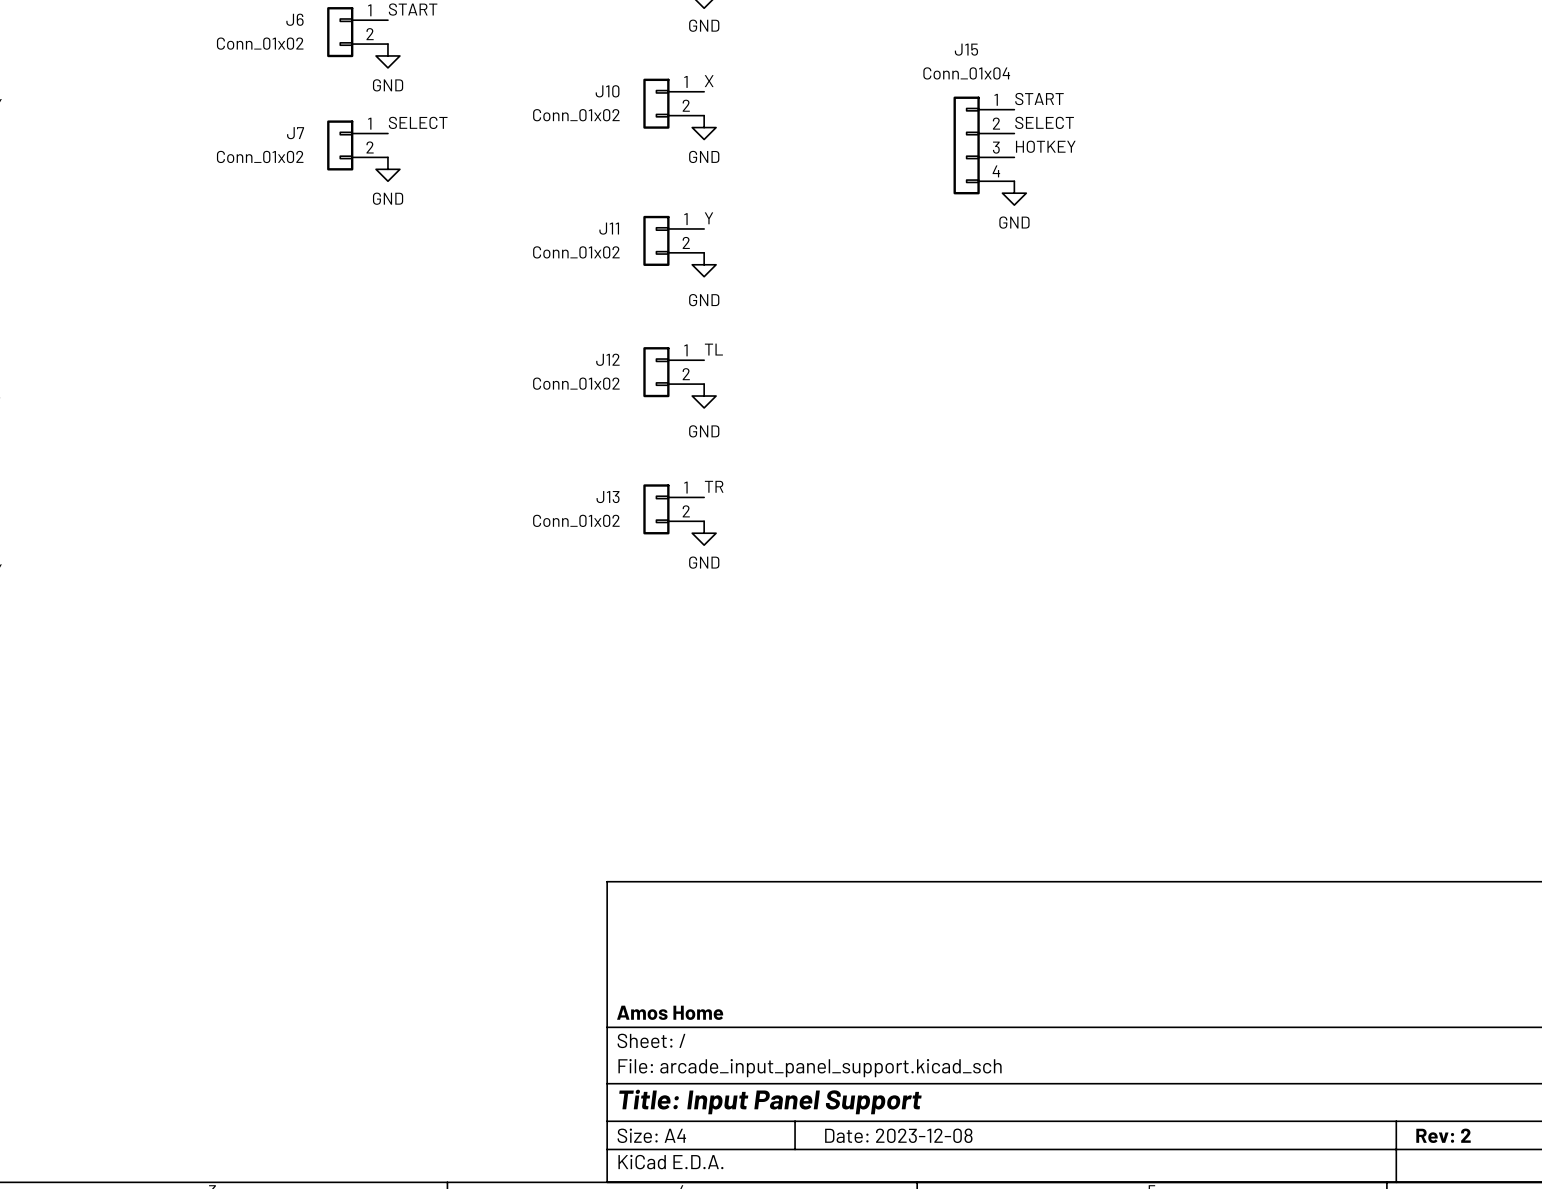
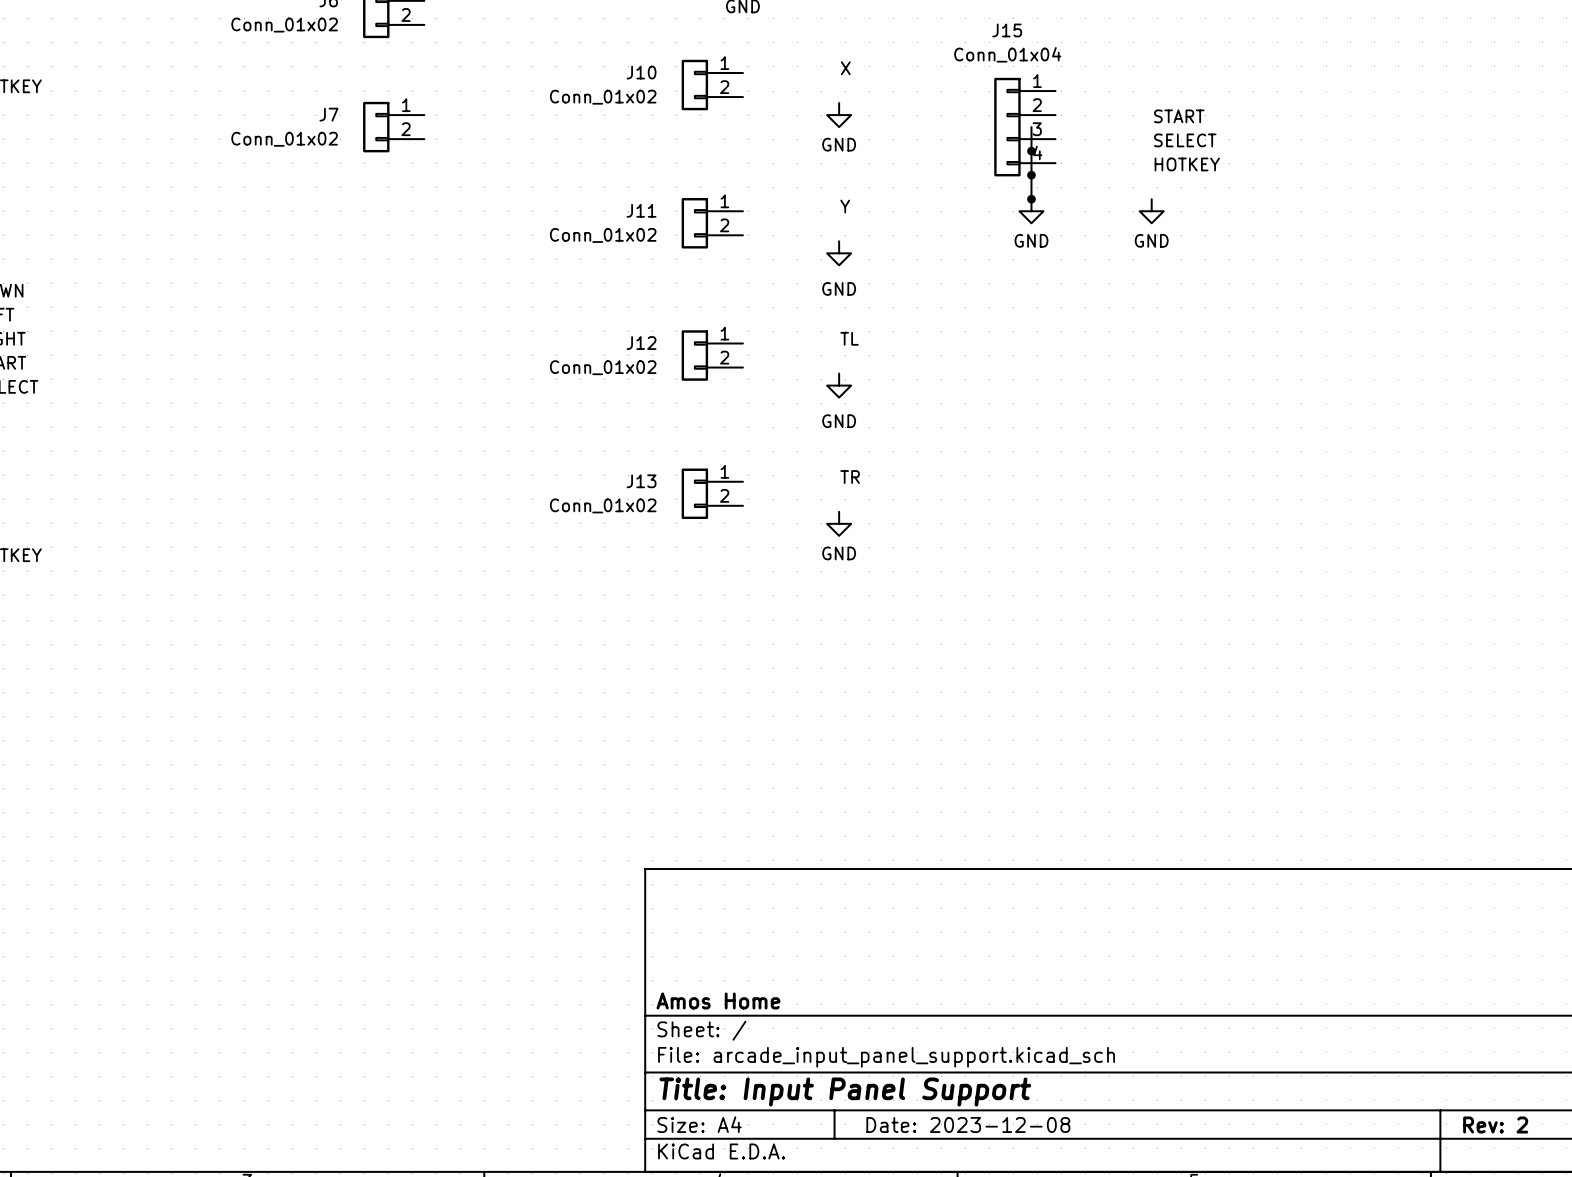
power symbol: GND (387, 55) -> none
label position: X (709, 81) -> X (845, 68)
label position: START (1039, 99) -> START (1179, 116)
label: SELECT (418, 122) -> none
label position: SELECT (1044, 122) -> SELECT (1185, 140)
power symbol: GND (704, 127) -> none
power symbol: none -> GND (839, 115)
wire: none -> (1031, 127) (1031, 199)
label position: HOTKEY (1045, 146) -> HOTKEY (1187, 164)
power symbol: GND (387, 169) -> none
junction: none -> (1031, 151)
junction: none -> (1031, 175)
power symbol position: GND (1014, 193) -> GND (1031, 211)
junction: none -> (1031, 199)
label position: Y (708, 218) -> Y (845, 206)
power symbol: none -> GND (1151, 211)
power symbol: GND (704, 264) -> none
power symbol: none -> GND (839, 253)
label position: TL (713, 349) -> TL (849, 338)
power symbol: GND (704, 396) -> none
power symbol: none -> GND (839, 385)
label position: TR (714, 486) -> TR (850, 477)
power symbol: GND (704, 533) -> none
power symbol: none -> GND (839, 523)

